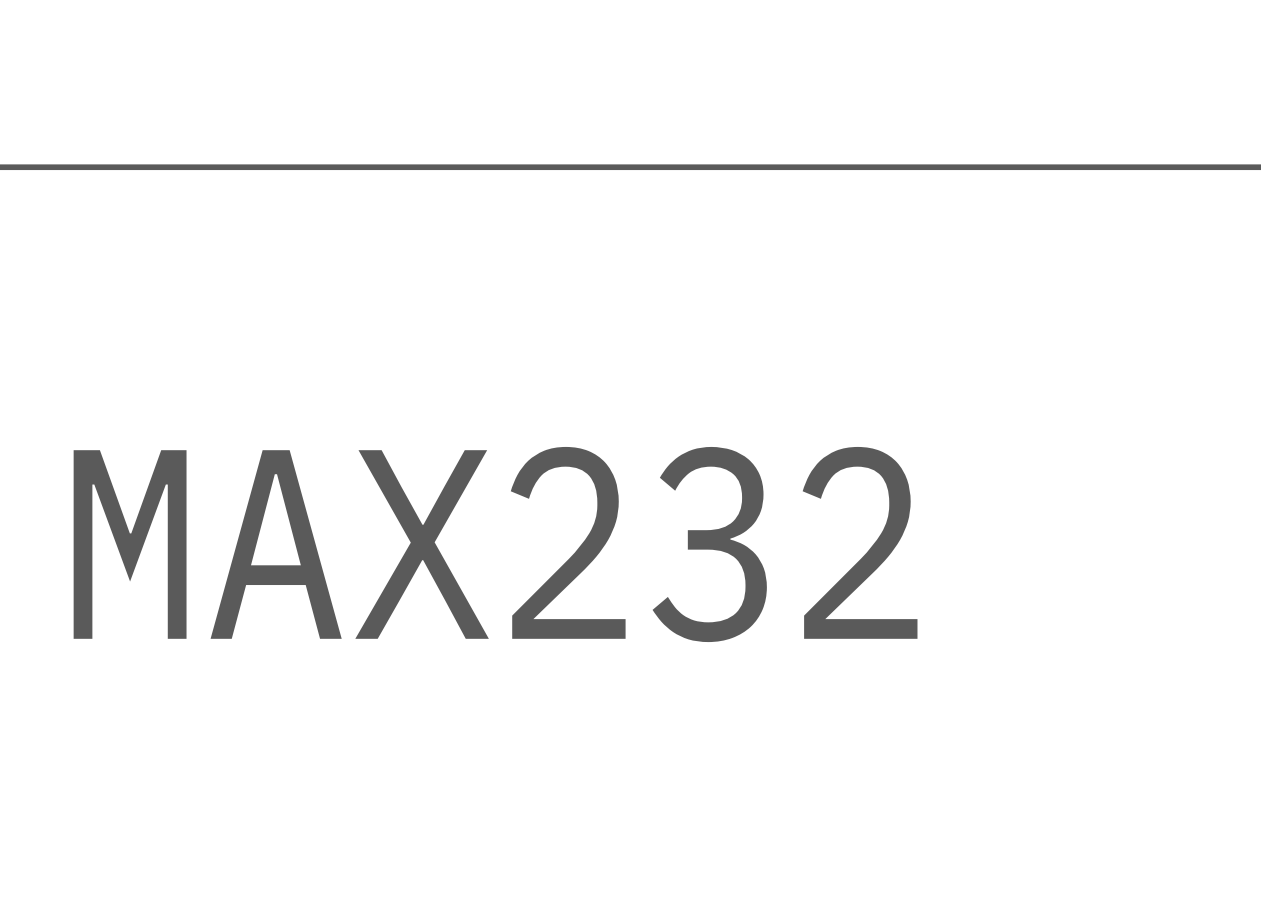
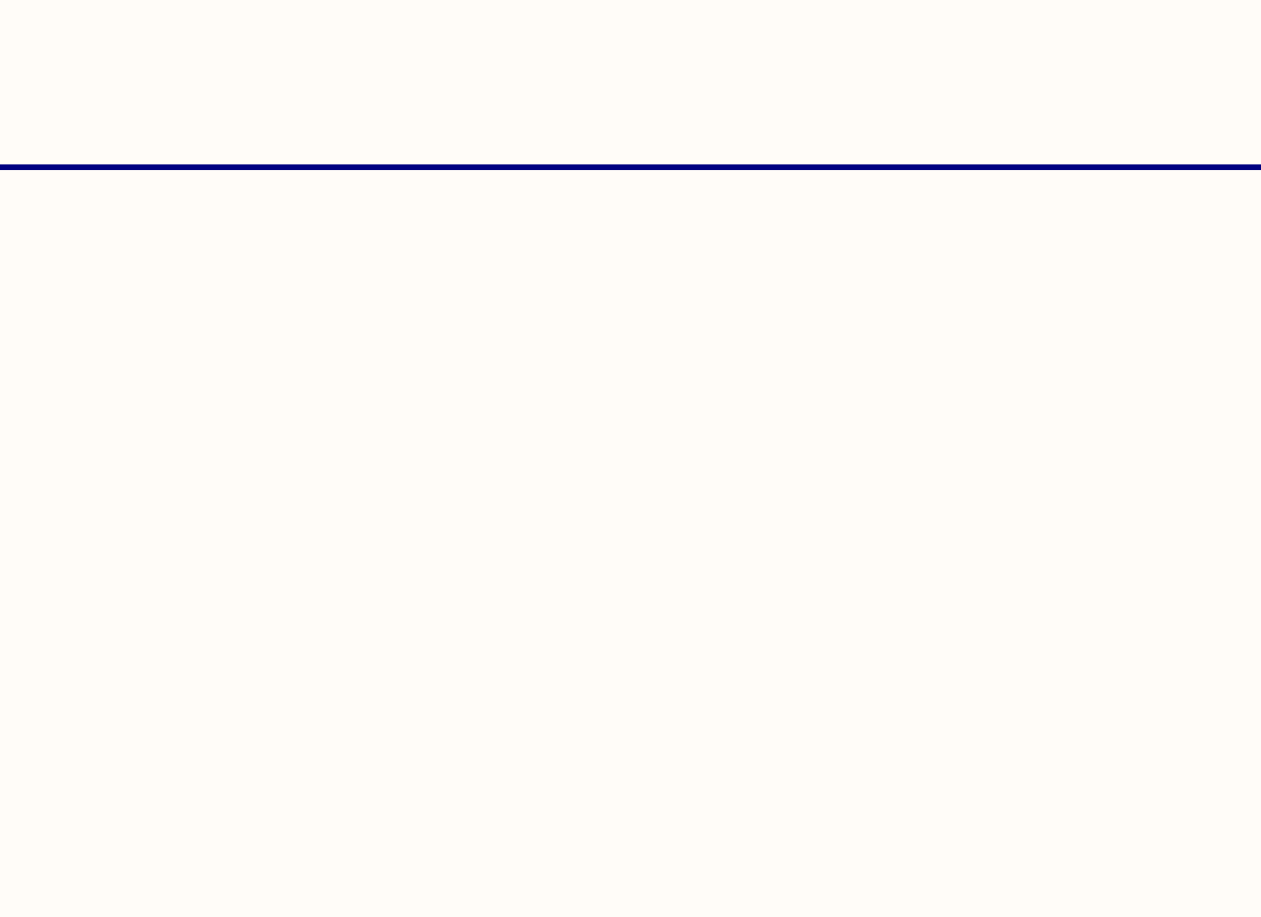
text: MAX232 (495, 544) -> none

